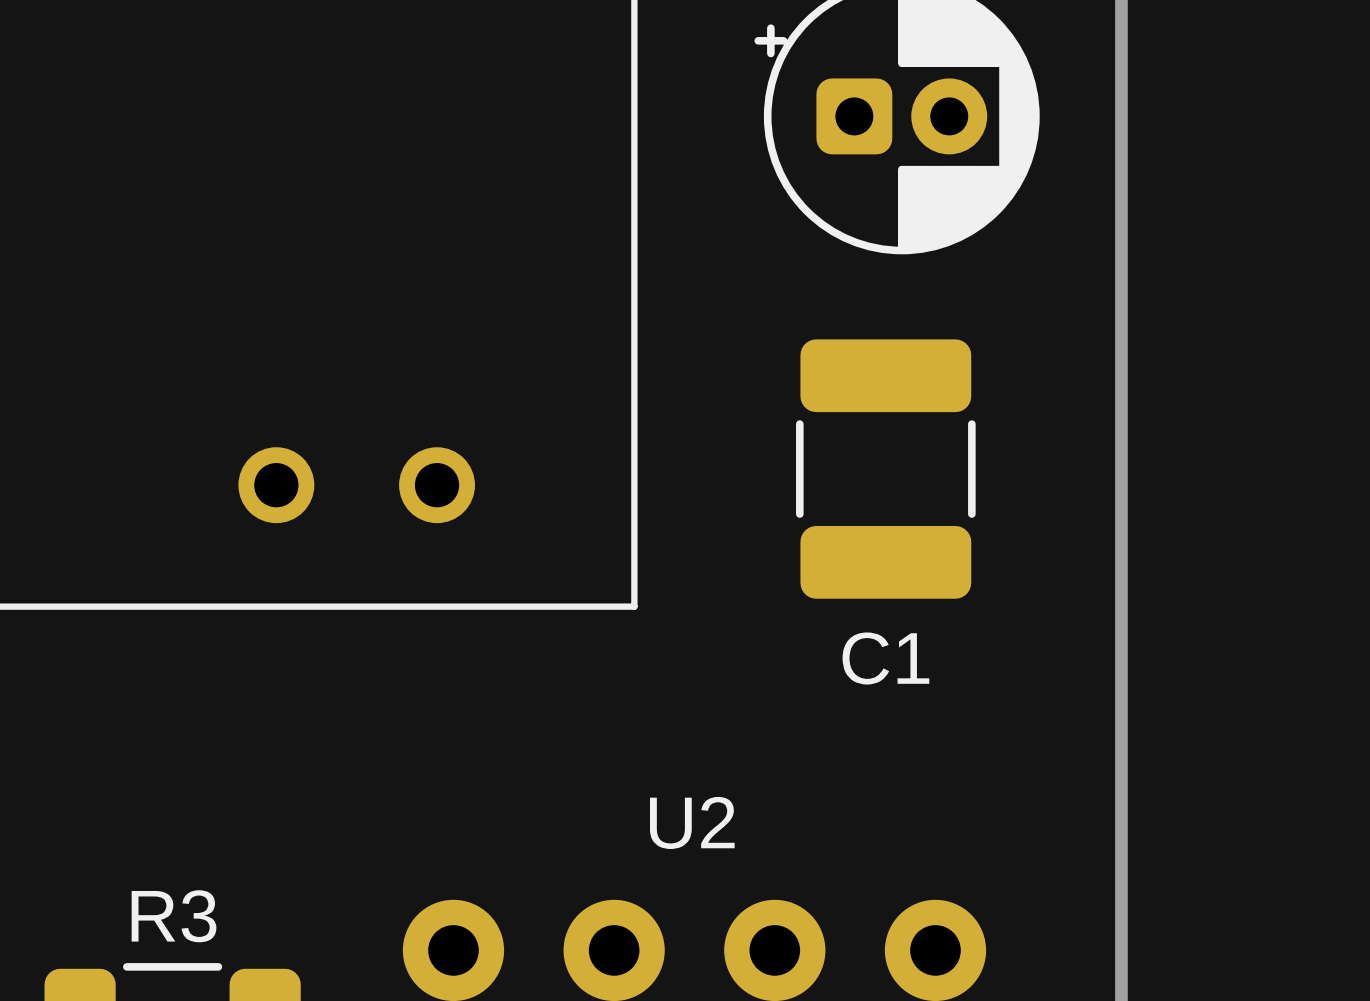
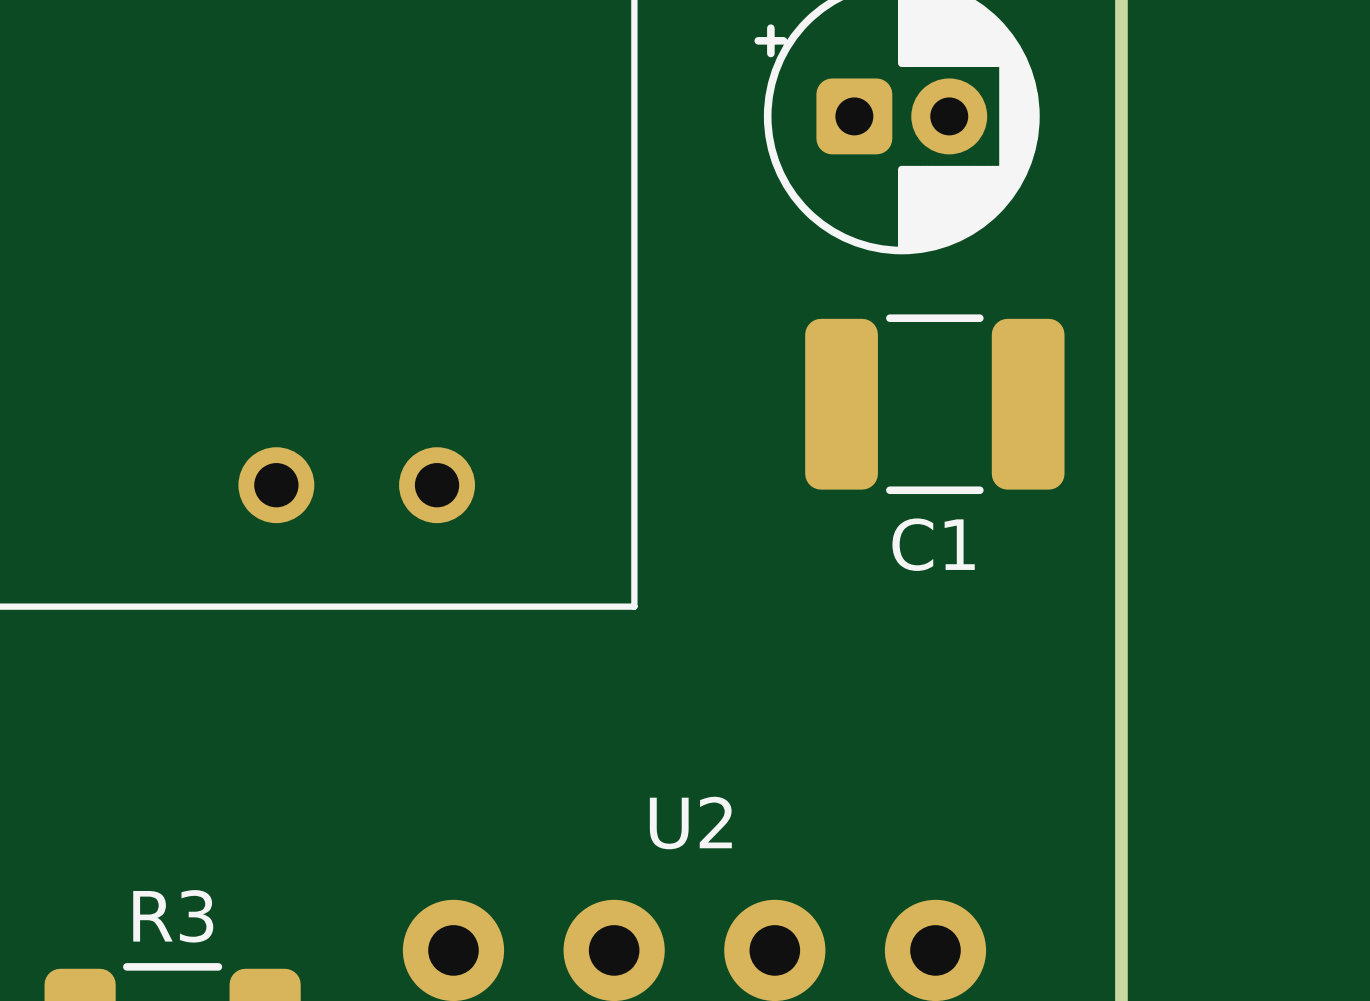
C1 rotation: 0° (885, 469) -> 90° clockwise (934, 404)

